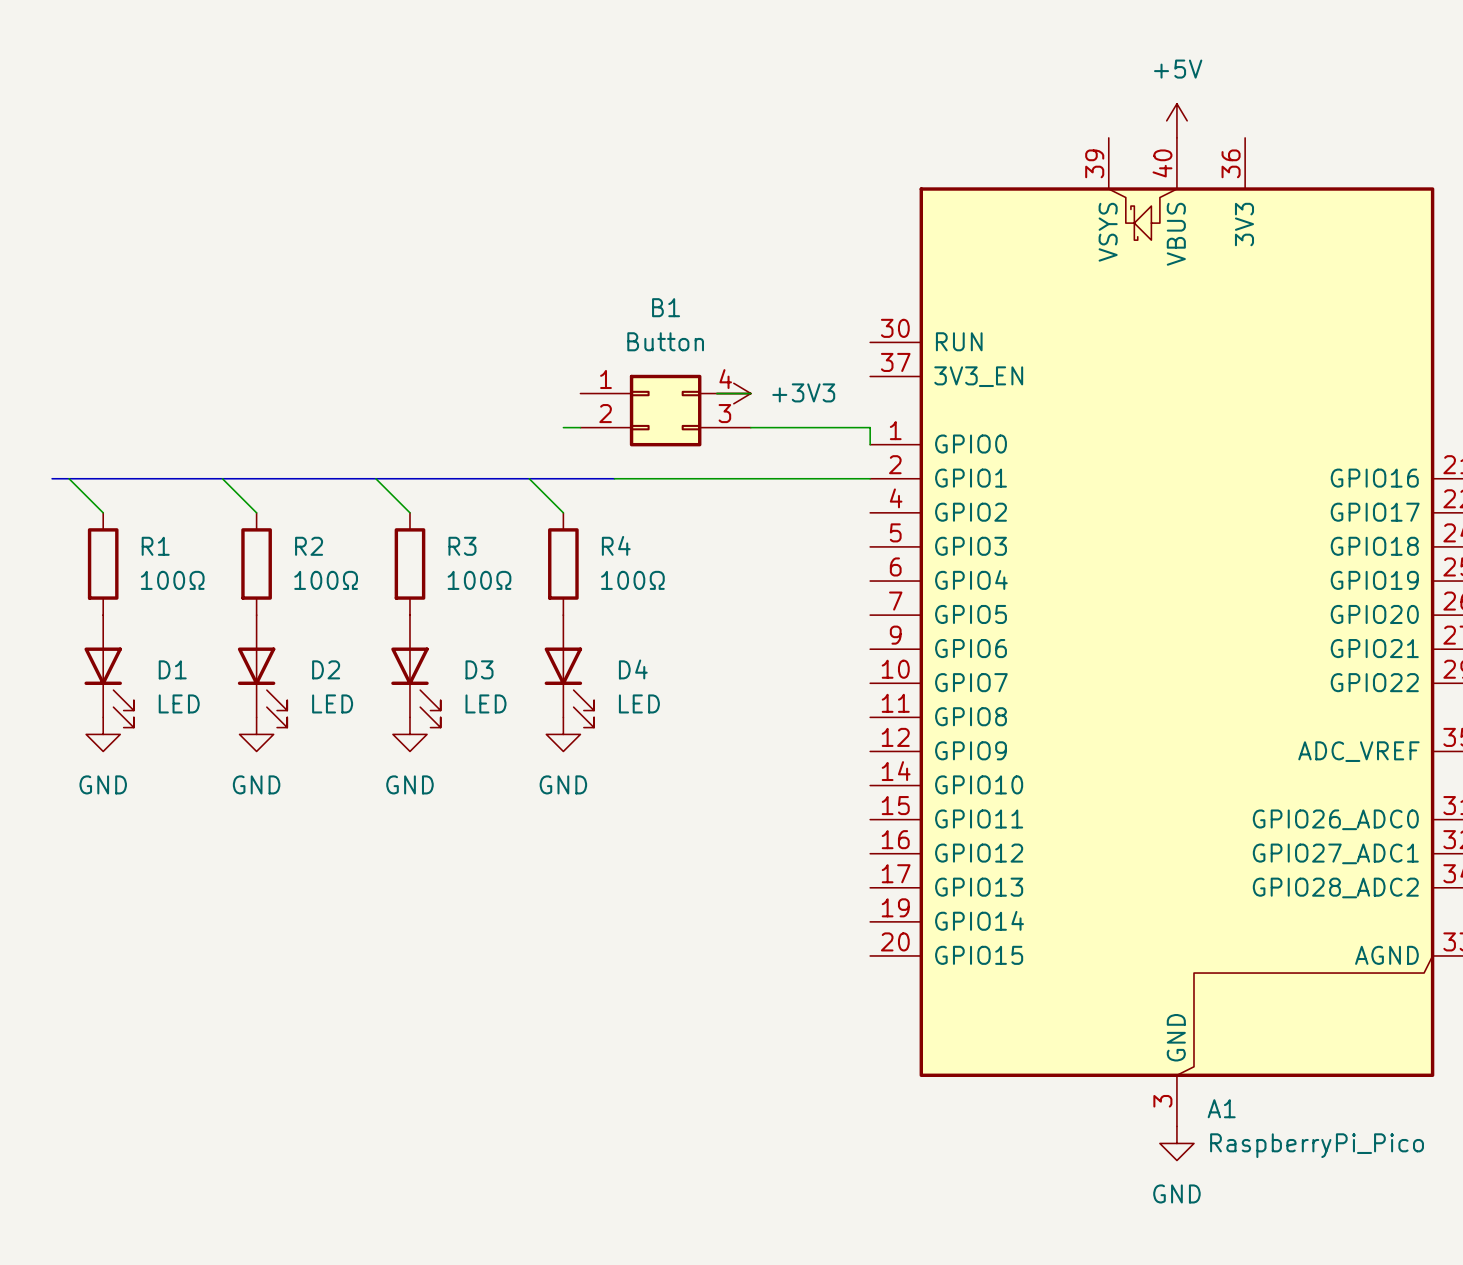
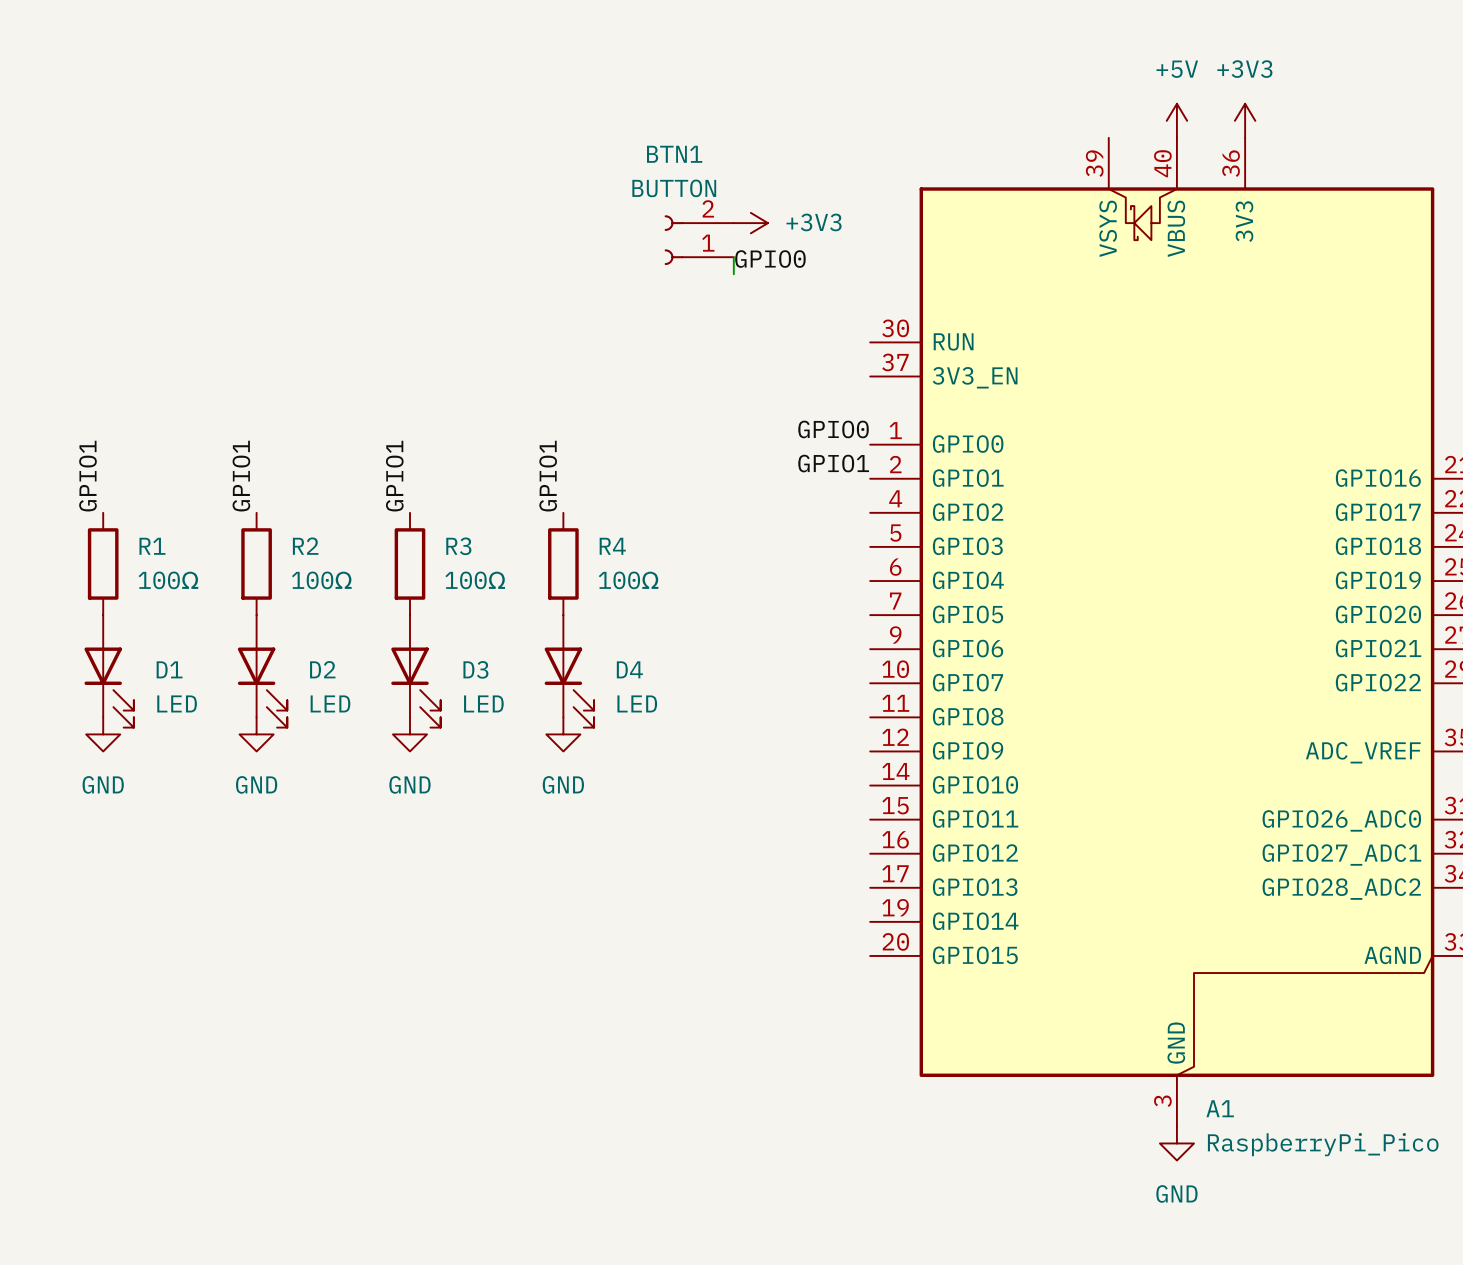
power symbol: none -> +3V3 (1245, 120)
BTN1: none -> BUTTON (699, 240)
wire: none -> (733, 257) (733, 274)
label: none -> GPIO0 (770, 259)
wire: (716, 393) (750, 393) -> none
power symbol position: +3V3 (733, 393) -> +3V3 (750, 223)
B1: Button (665, 410) -> none
wire: (563, 427) (580, 427) -> none
wire: (750, 427) (870, 427) (870, 444) -> none
label: none -> GPIO0 (833, 429)
label: none -> GPIO1 (833, 463)
label: none -> GPIO1 (87, 476)
label: none -> GPIO1 (241, 476)
label: none -> GPIO1 (394, 476)
label: none -> GPIO1 (548, 476)
bus: (52, 478) (614, 478) -> none
wire: (69, 478) (103, 512) -> none
wire: (222, 478) (256, 512) -> none
wire: (375, 478) (409, 512) -> none
wire: (529, 478) (563, 512) -> none
wire: (614, 478) (870, 478) -> none

